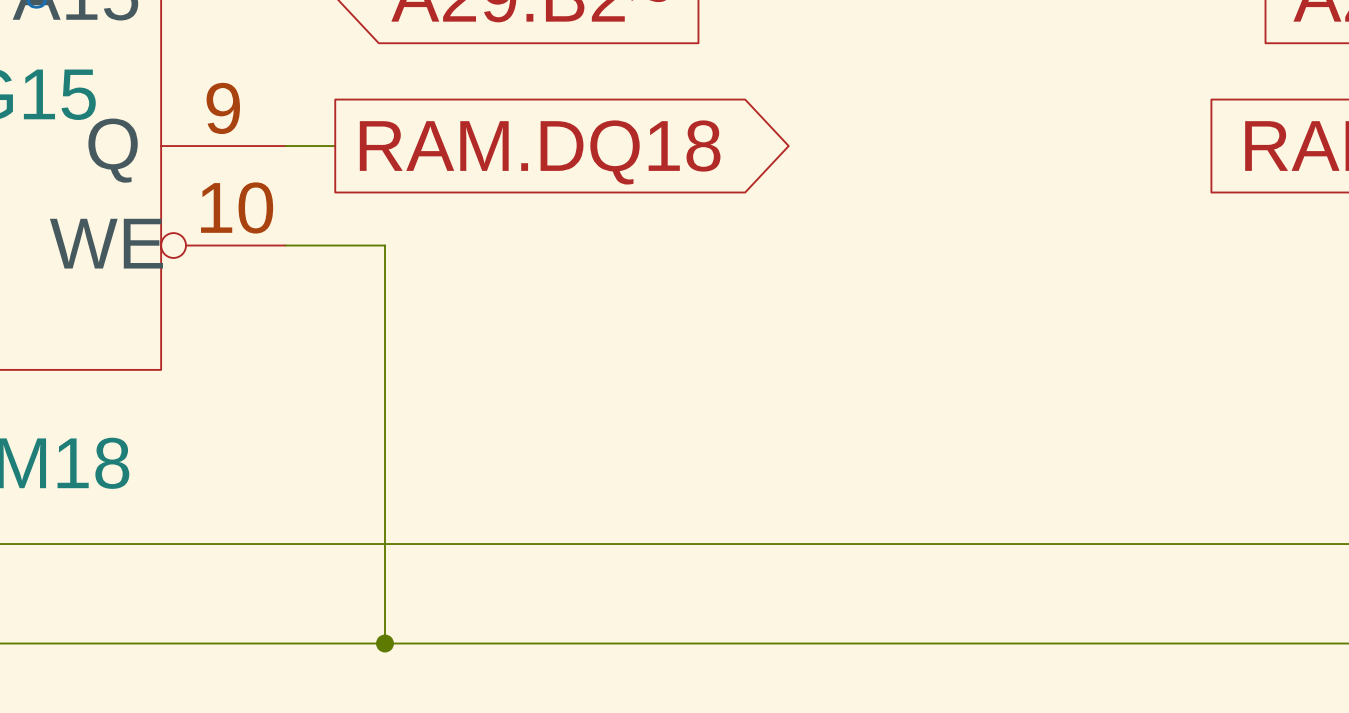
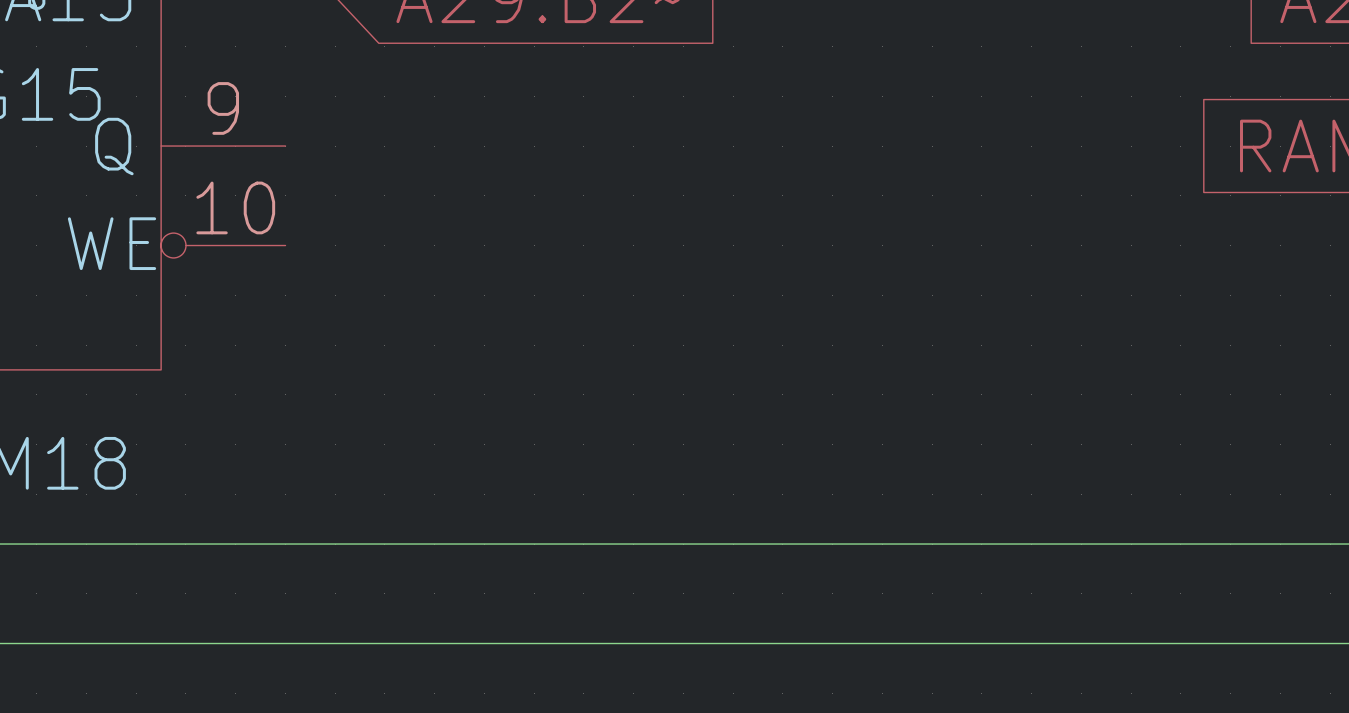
wire: (285, 146) (335, 146) -> none
global label: RAM.DQ18 (540, 152) -> none
wire: (285, 245) (384, 245) (384, 643) -> none
junction: (384, 643) -> none

